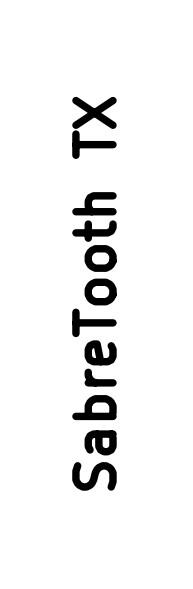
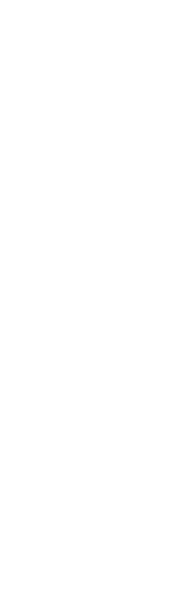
text: SabreTooth TX (94, 293) -> none

